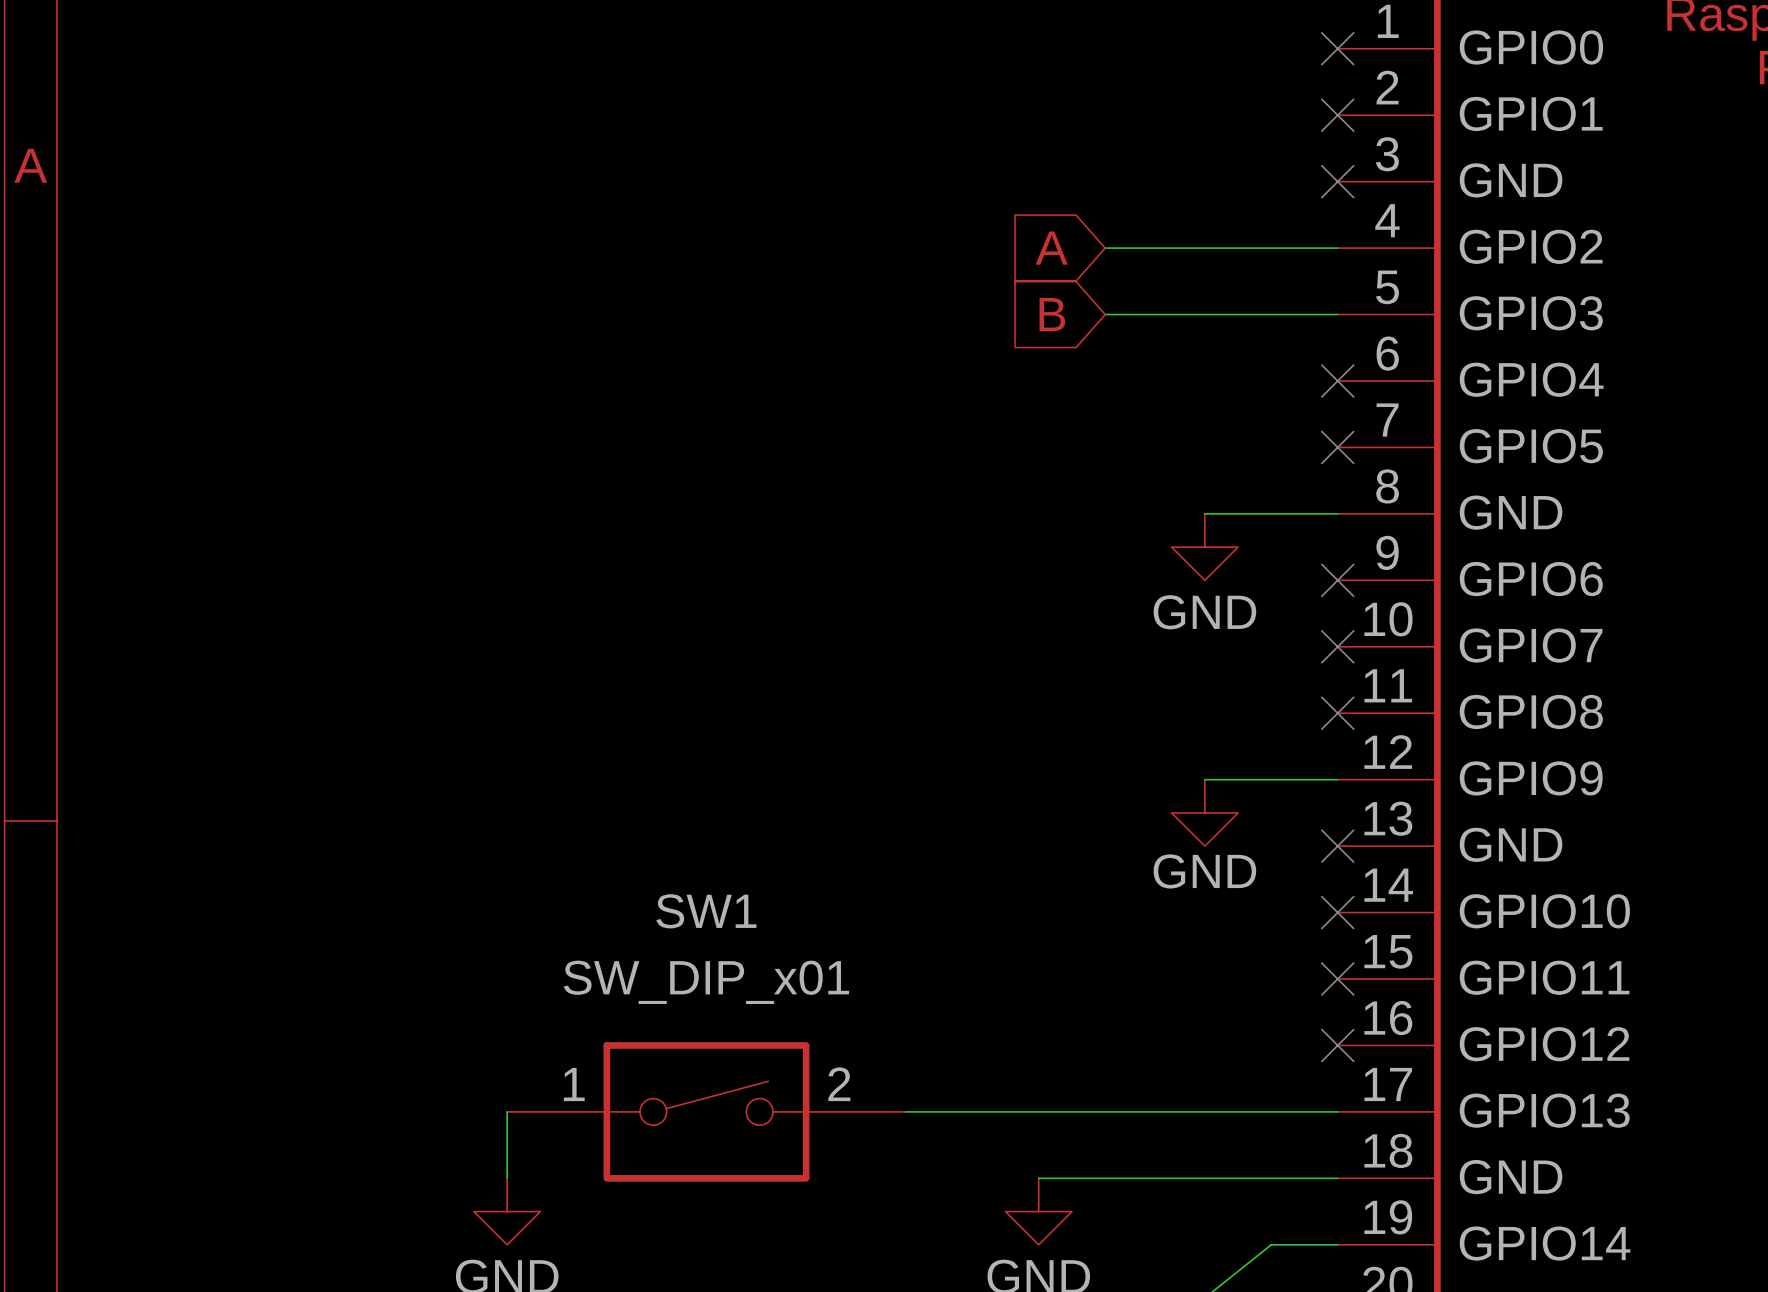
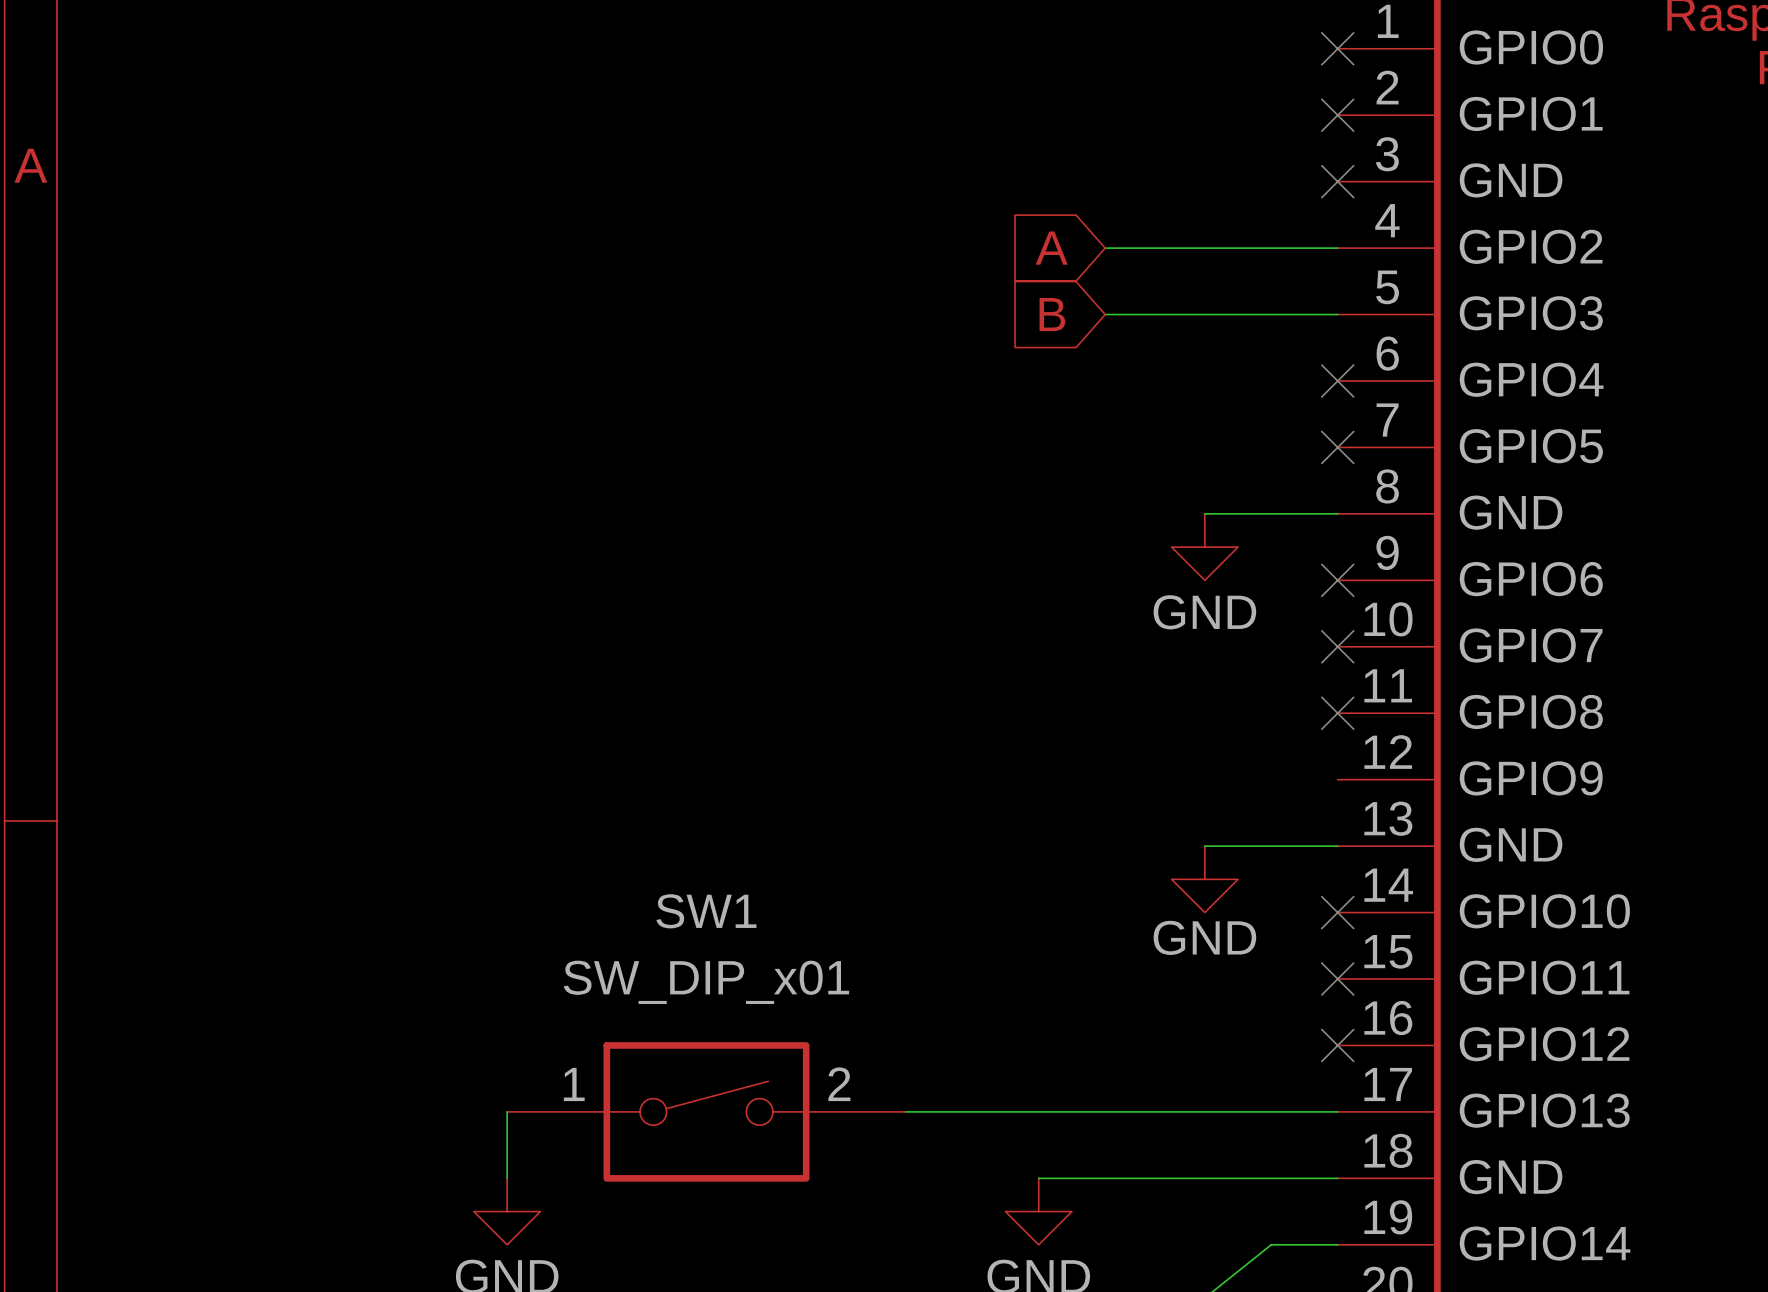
wire: (1204, 779) (1337, 779) -> (1204, 846) (1337, 846)
power symbol position: GND (1204, 812) -> GND (1204, 879)
no-connect mark: (1337, 846) -> none

